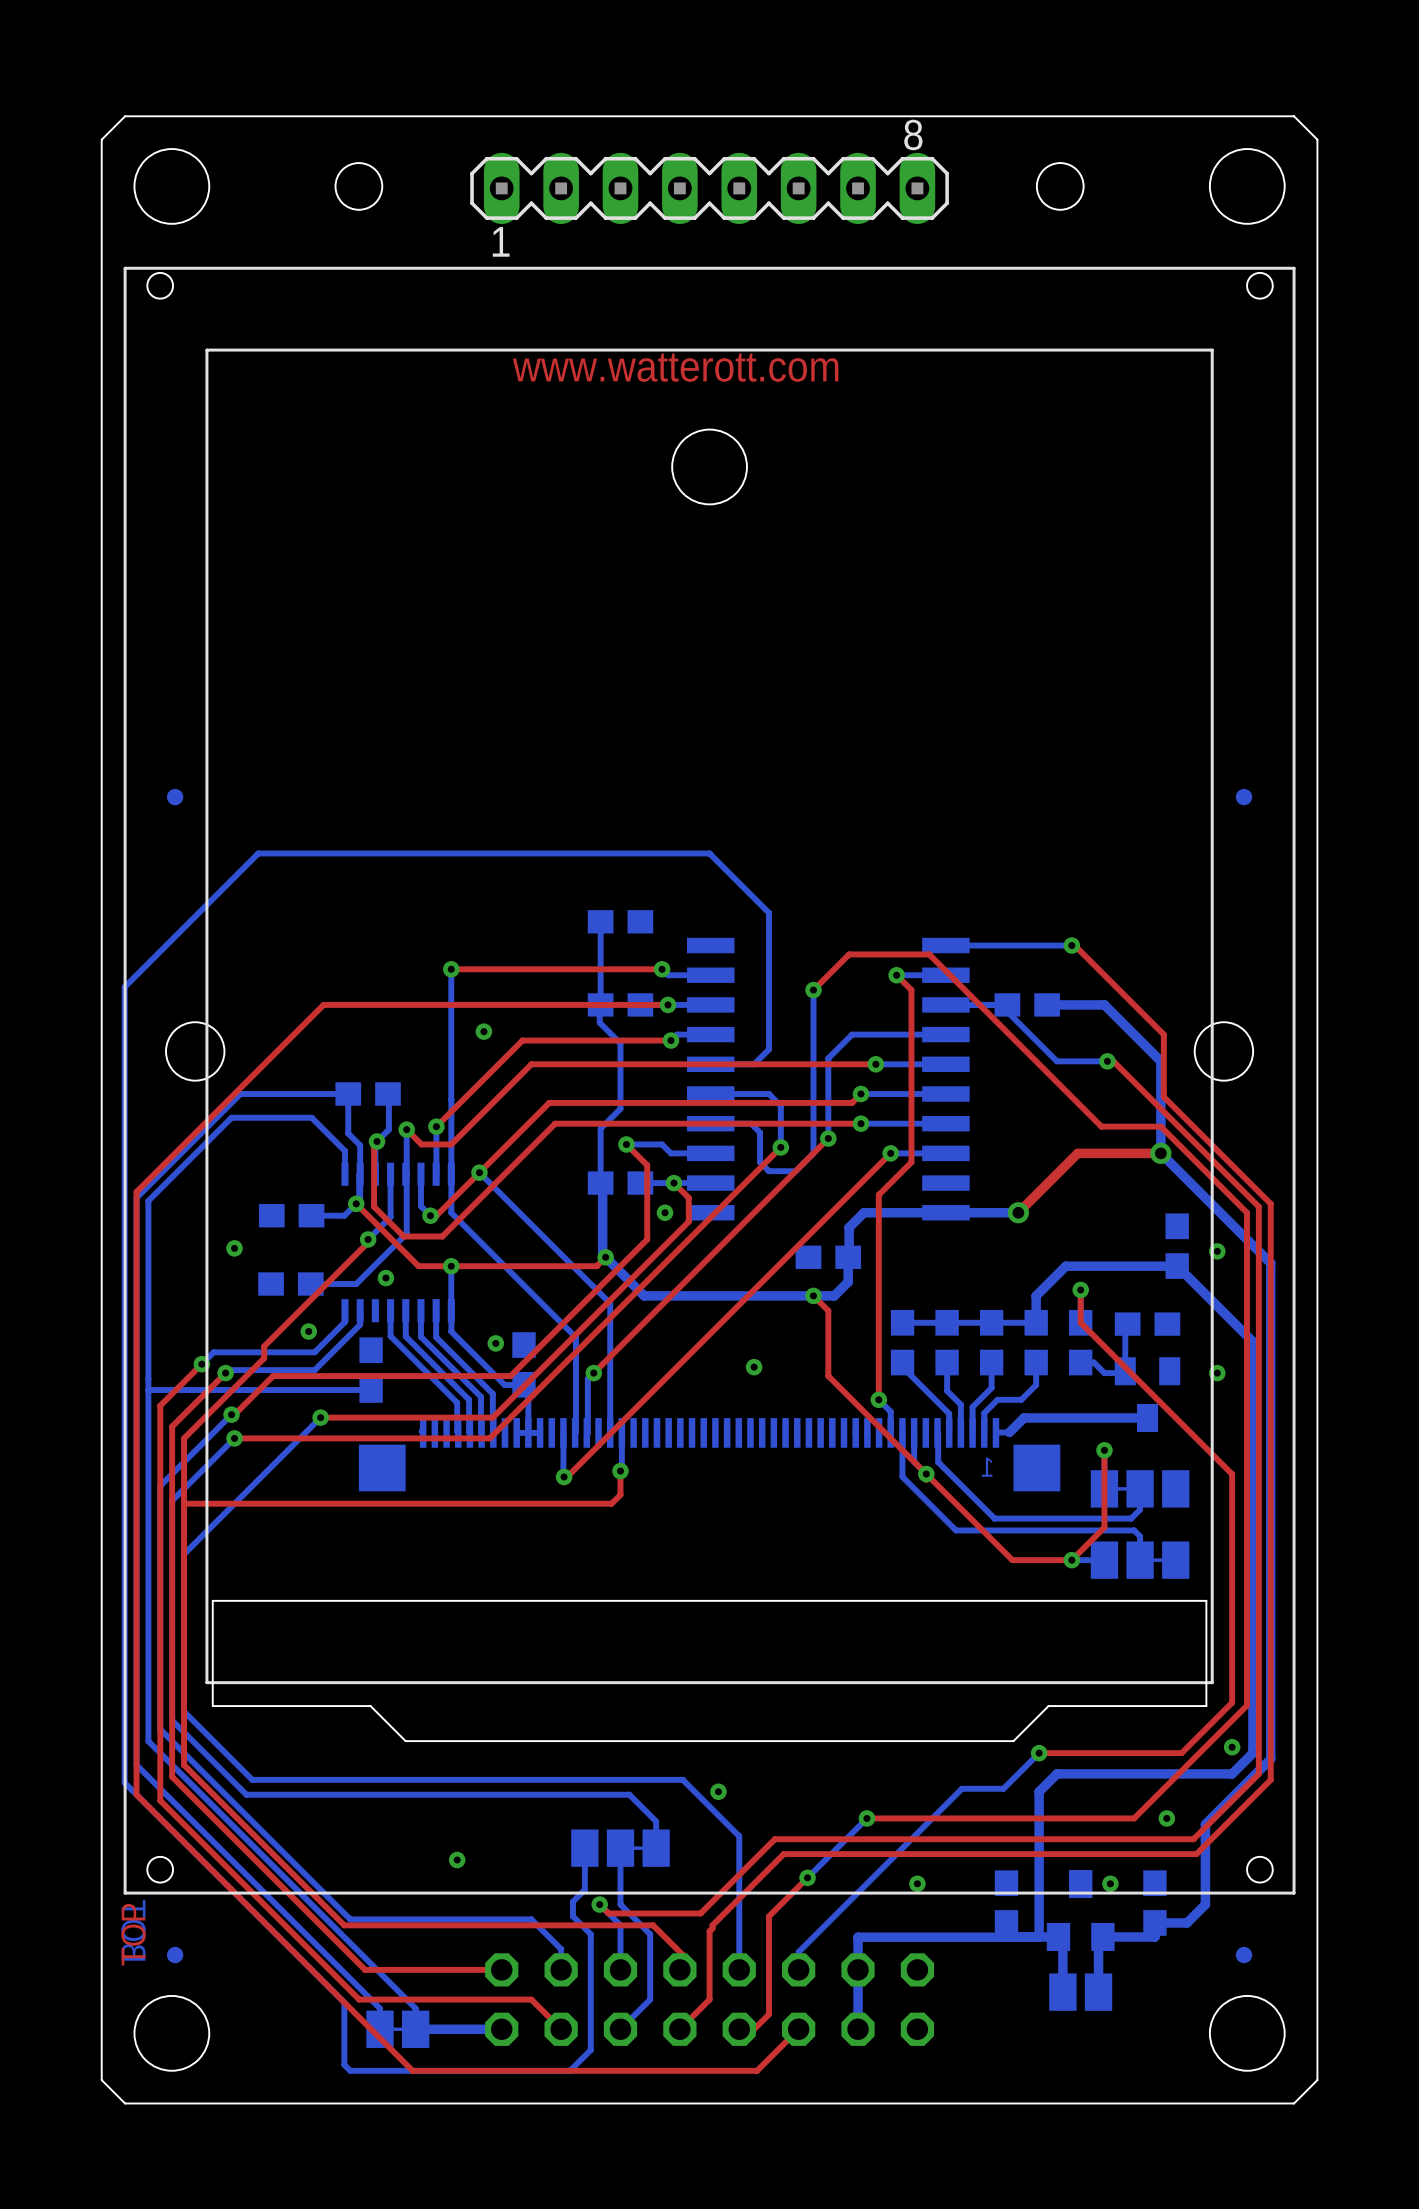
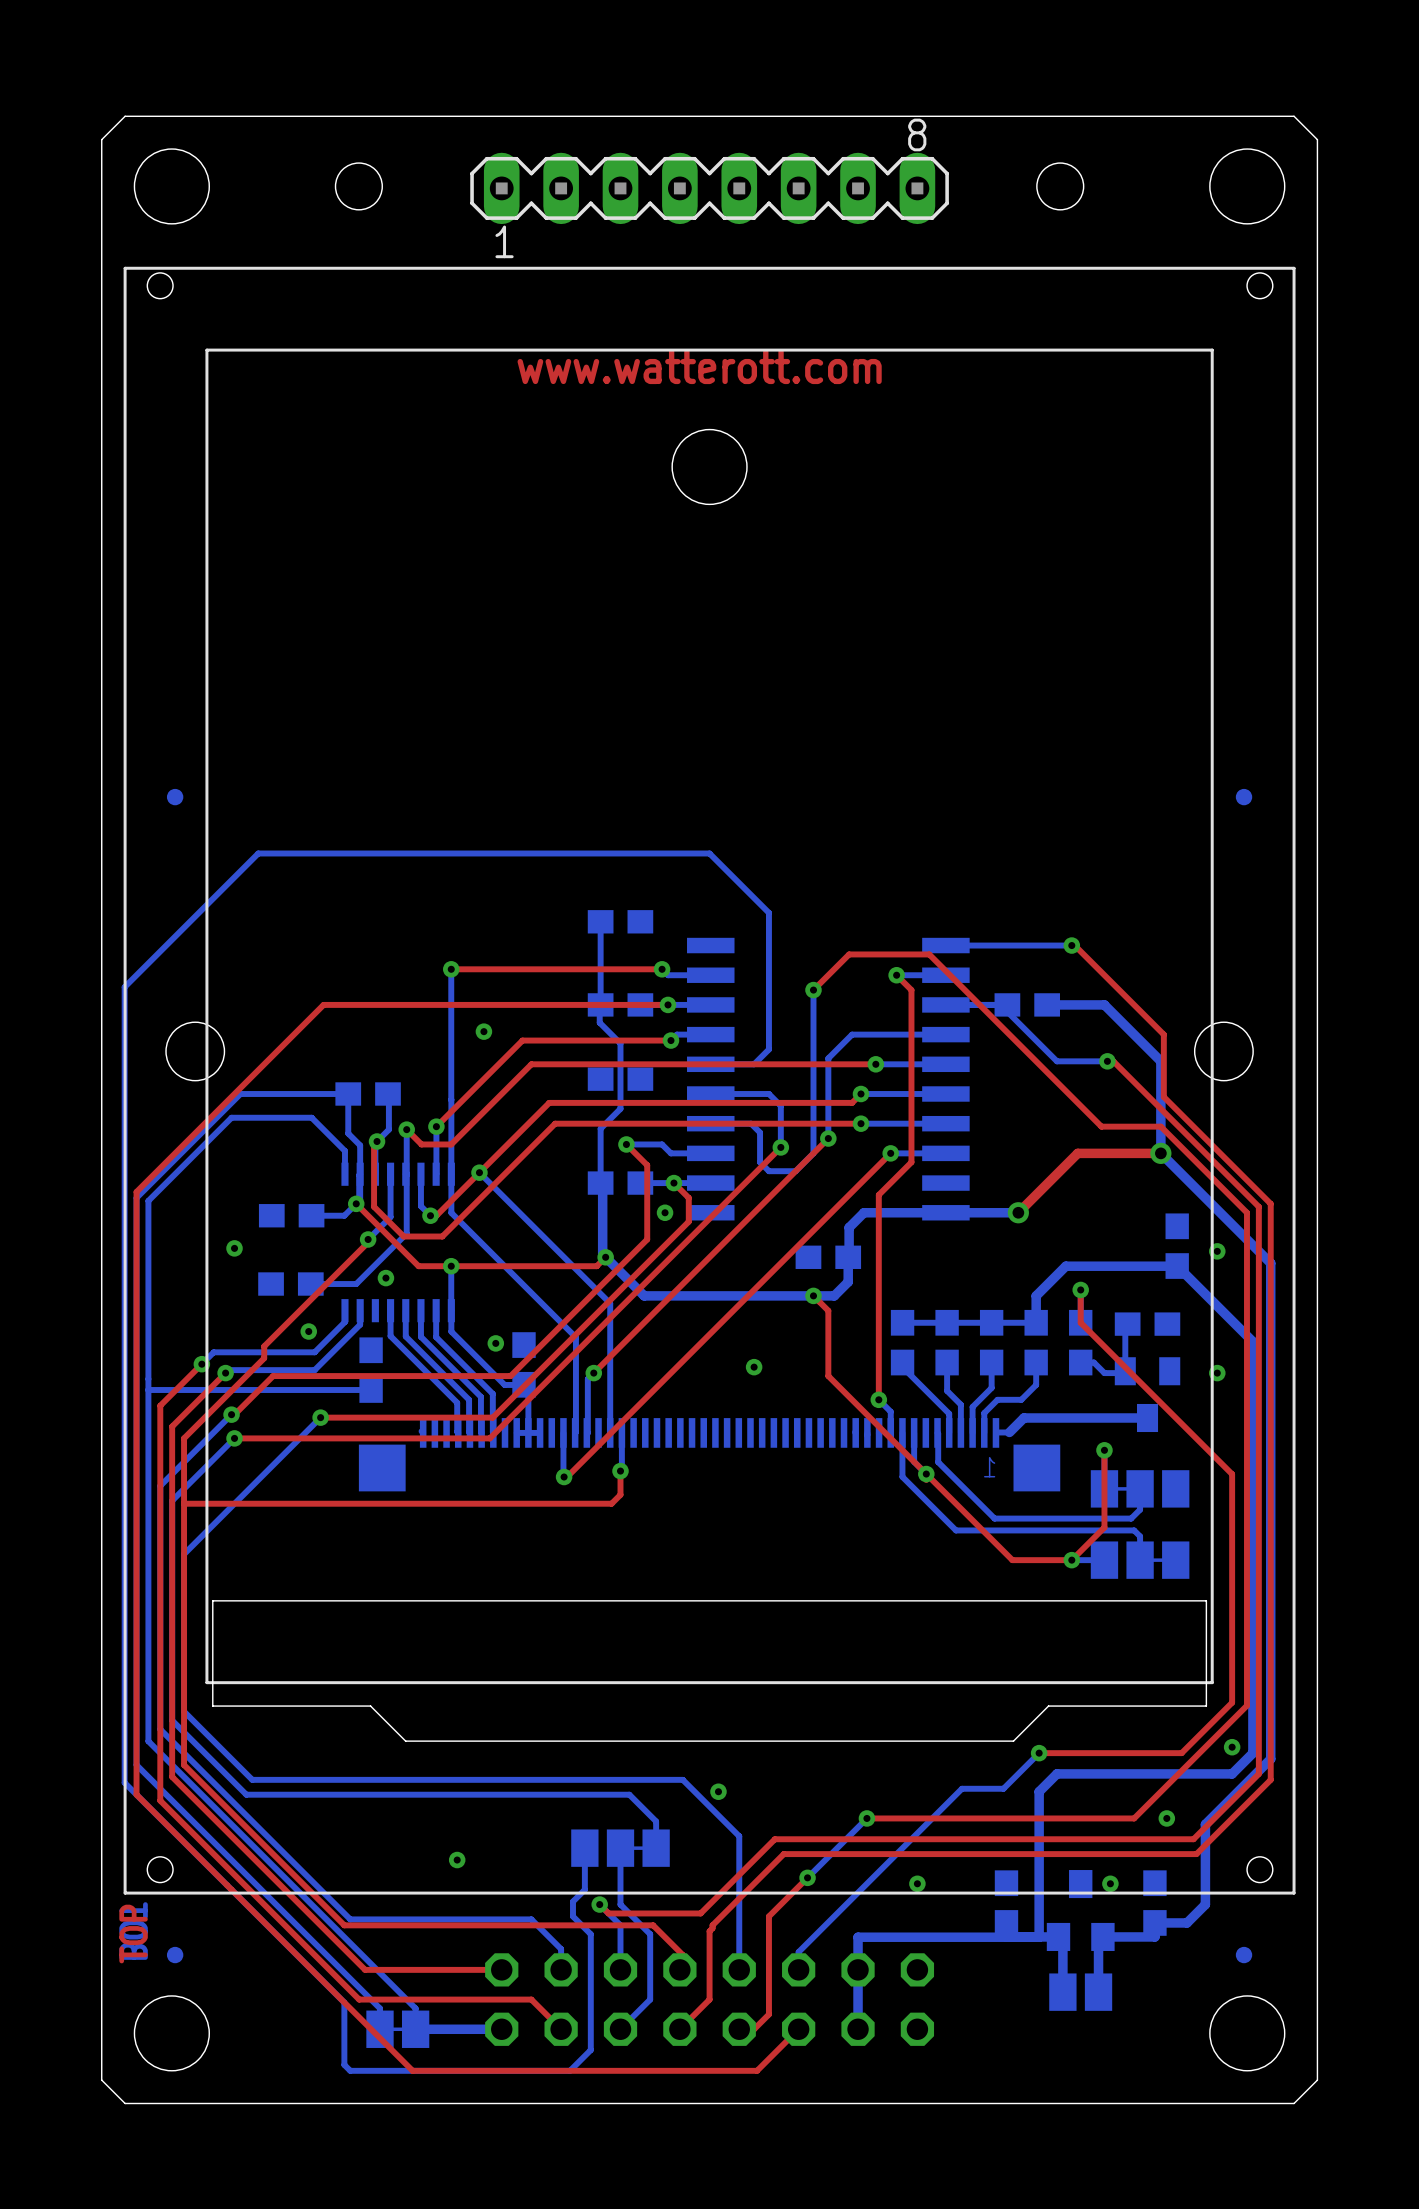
part: none -> (620, 1079)

